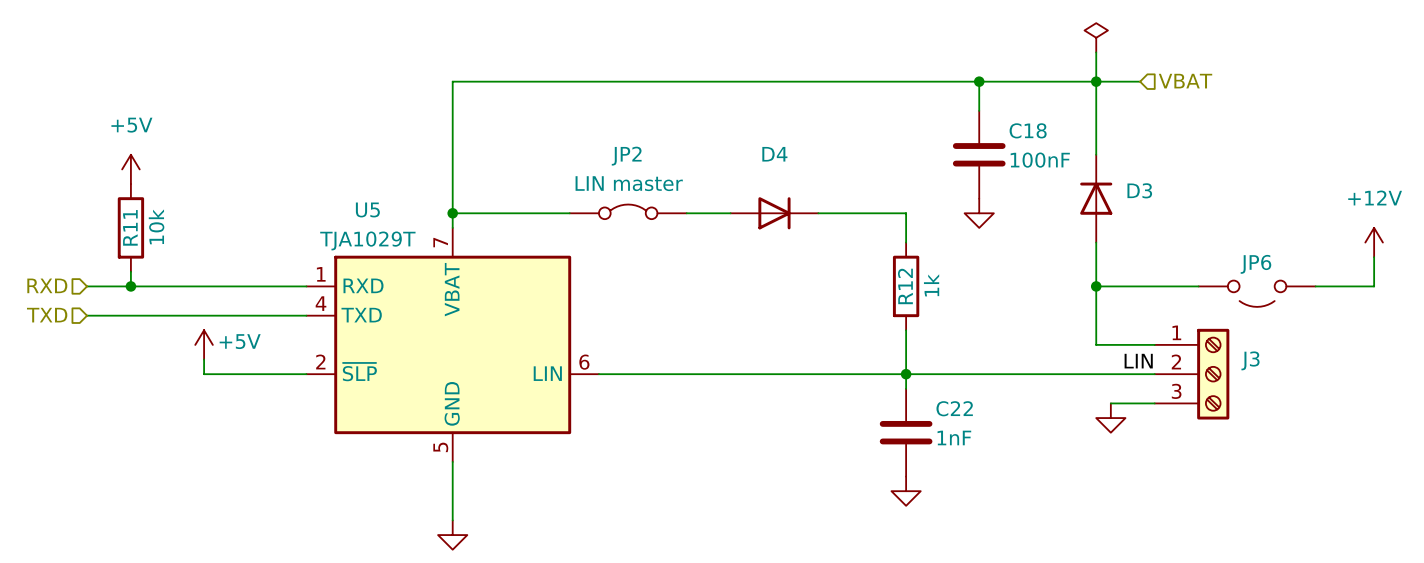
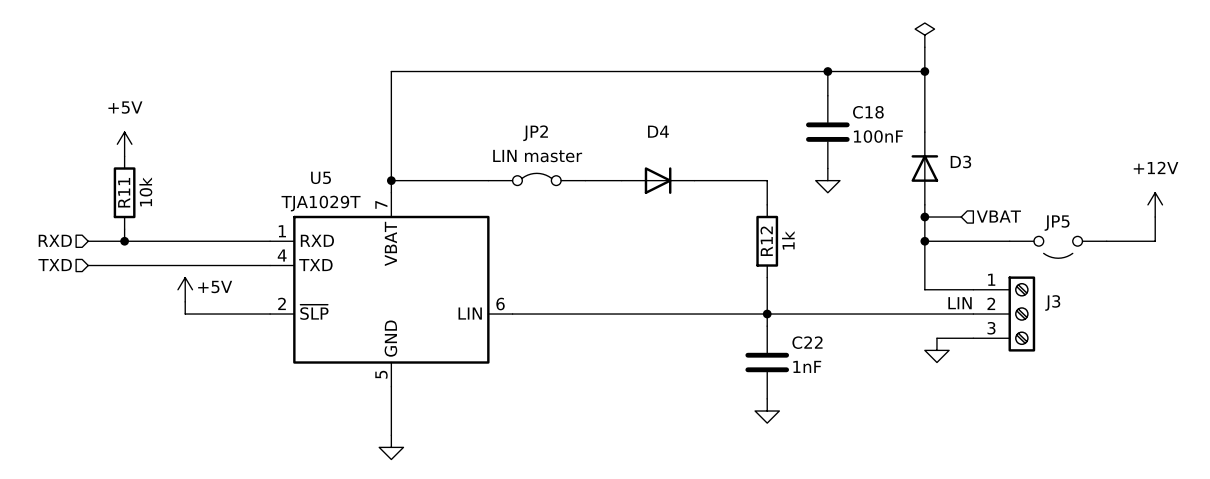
wire: (1096, 81) (1140, 81) -> (924, 217) (961, 217)
hierarchical label position: VBAT (1185, 81) -> VBAT (998, 216)
junction: none -> (924, 217)
JP6 name: JP6 (1255, 264) -> JP5 (1057, 223)

